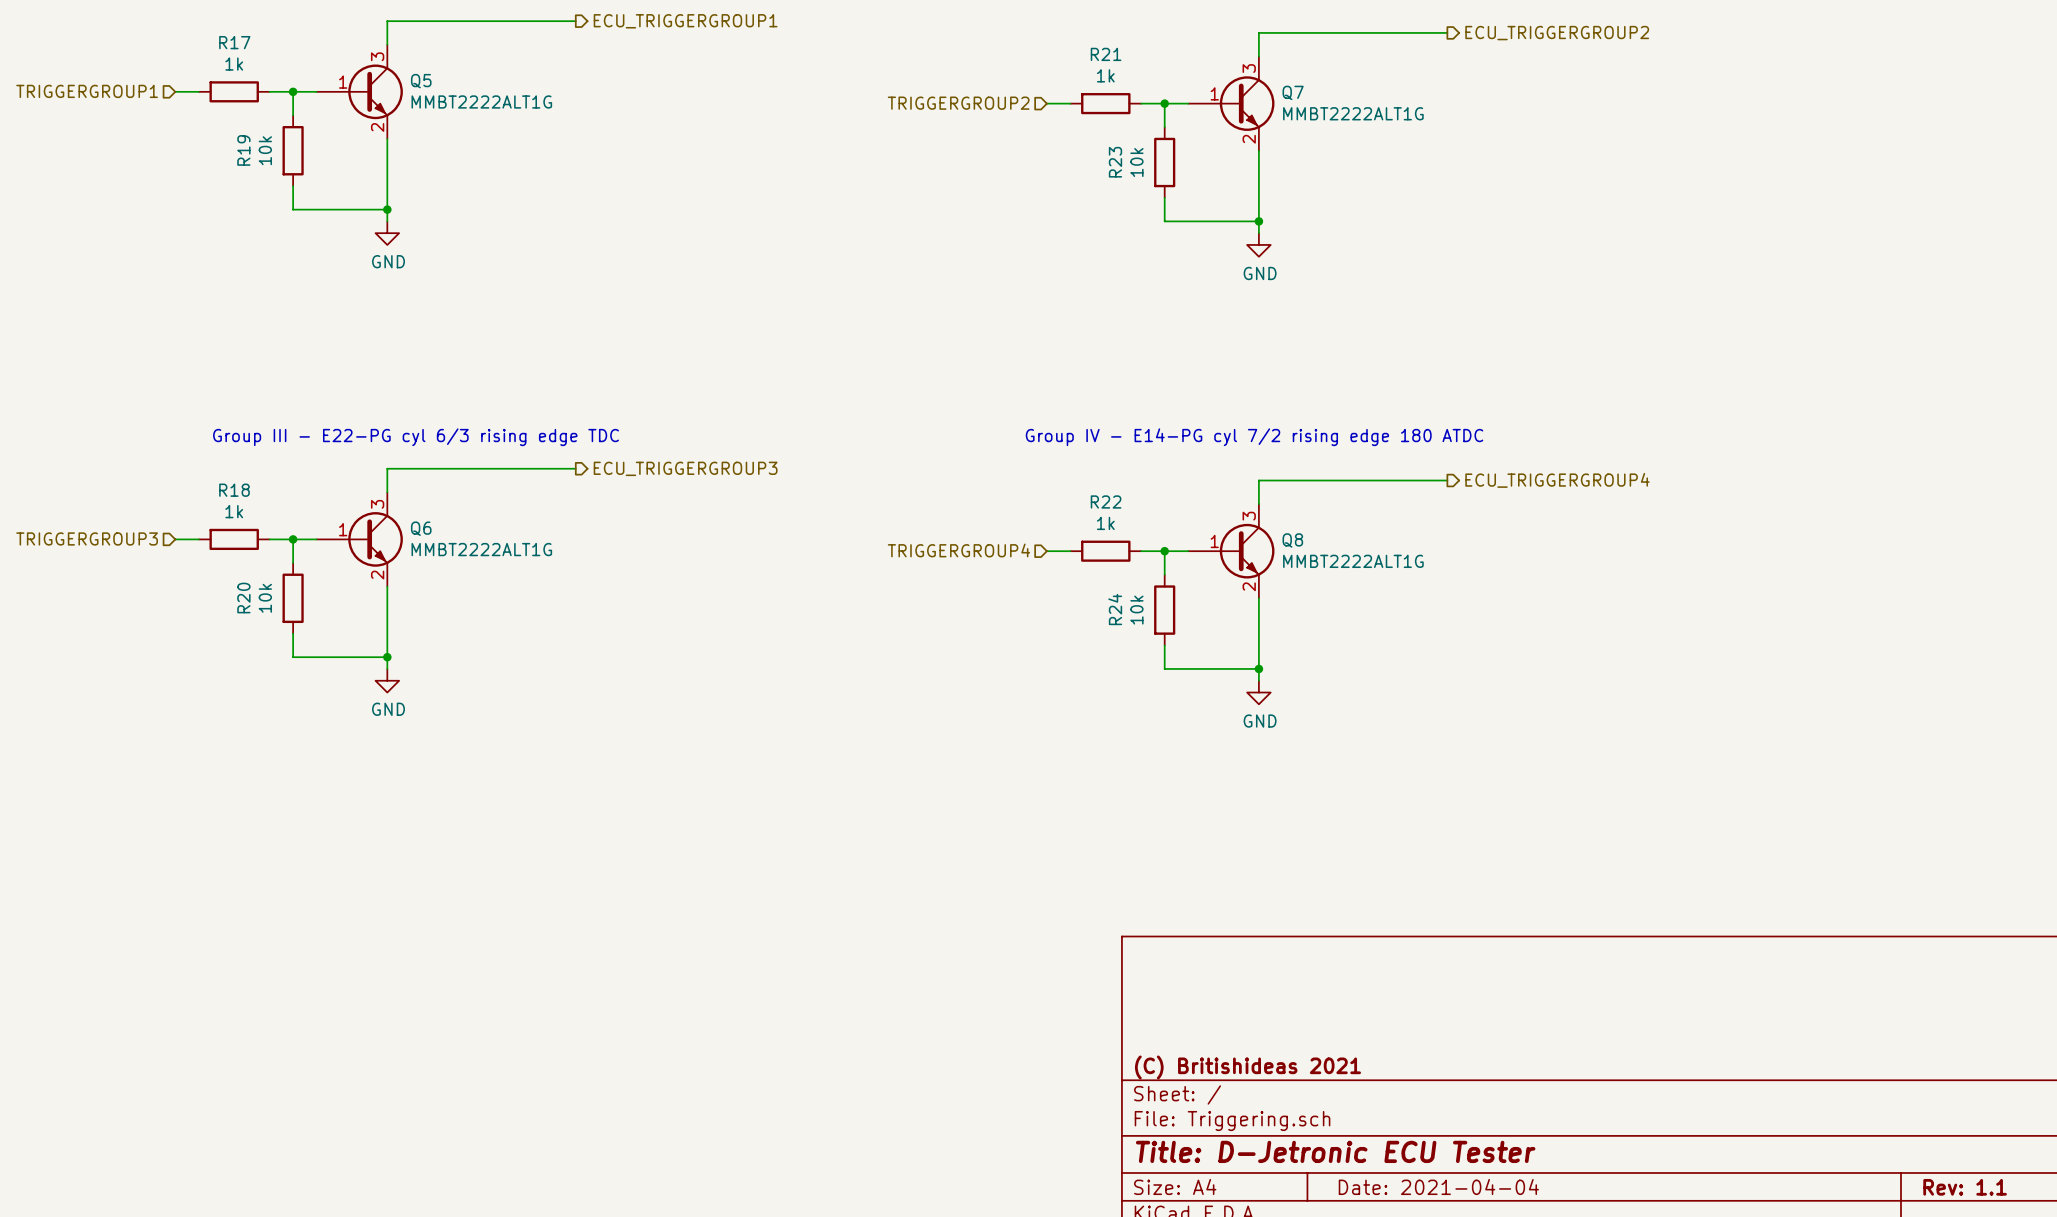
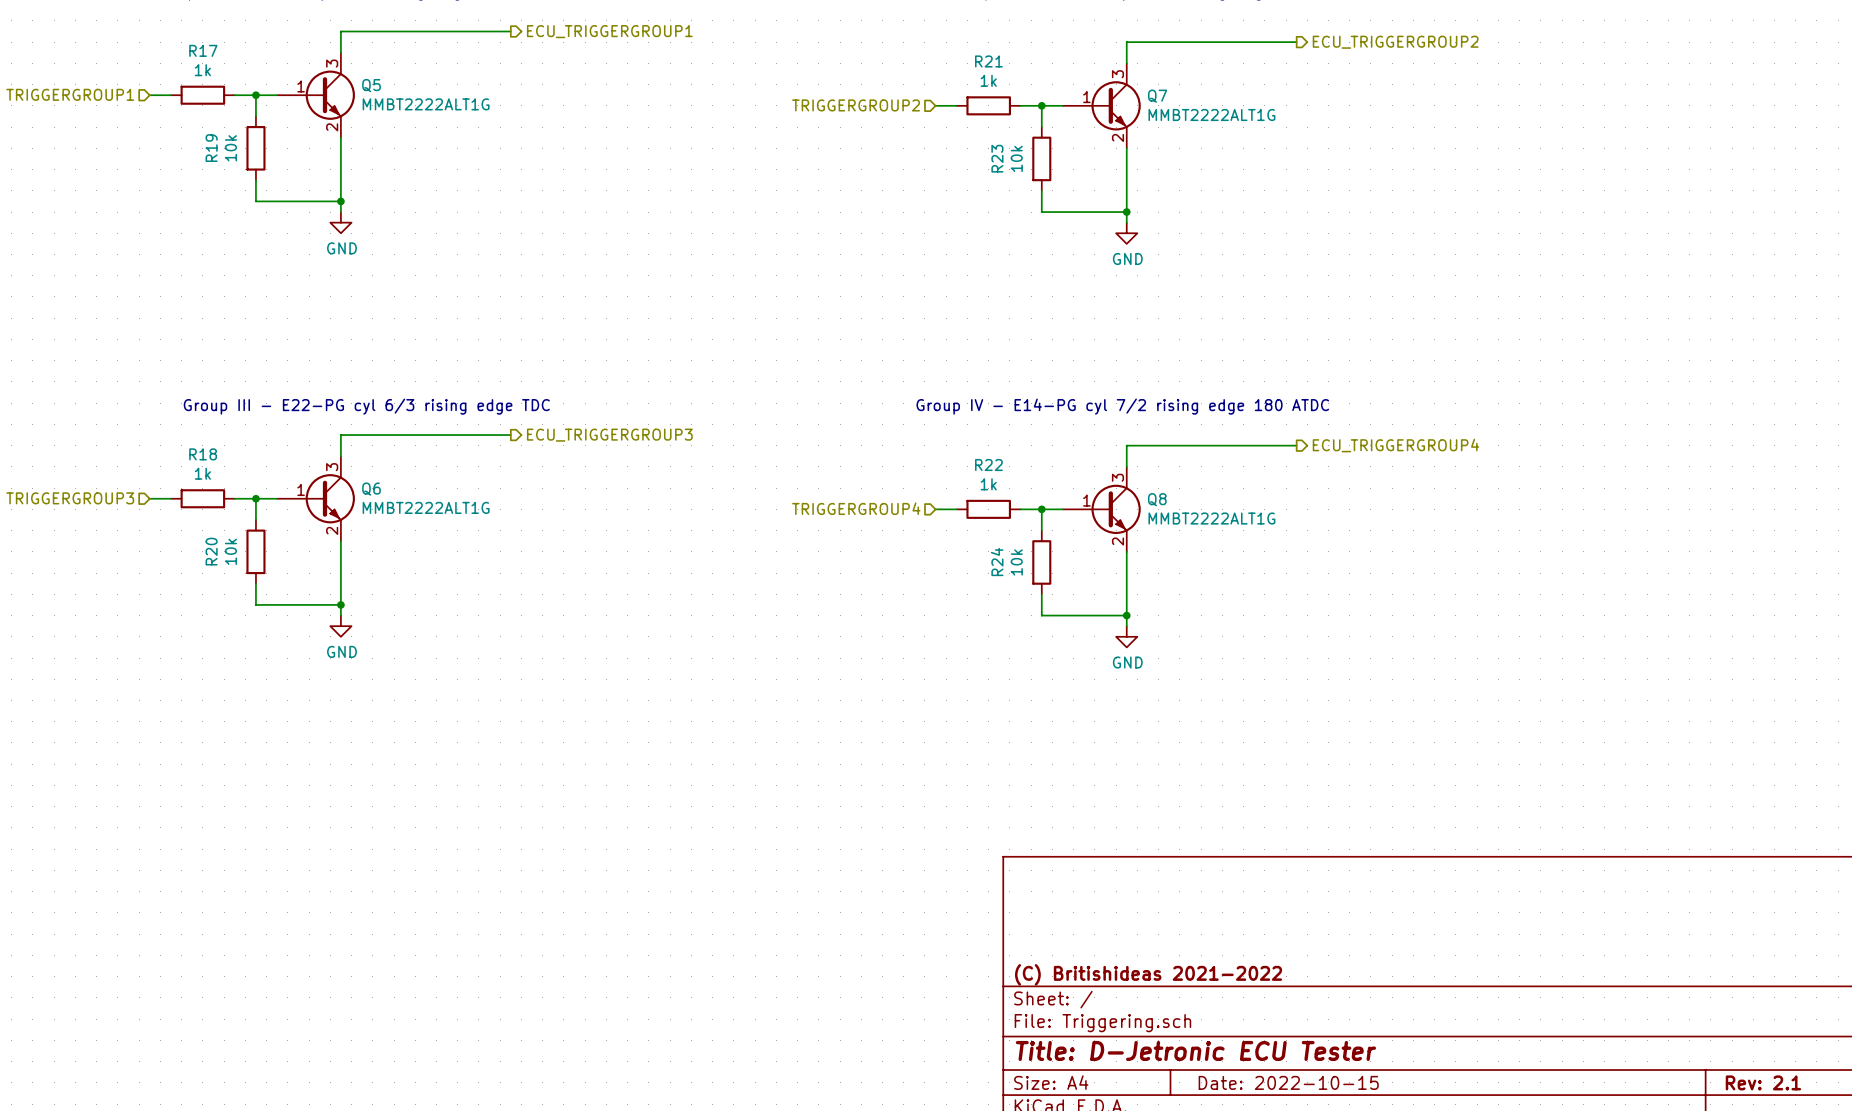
title block: (C) Britishideas 2021 (1248, 1067) -> (C) Britishideas 2021-2022 (1148, 974)
title block: Date: 2021-04-04 (1438, 1186) -> Date: 2022-10-15 (1288, 1082)
title block: Rev: 1.1 (1965, 1187) -> Rev: 2.1 (1763, 1082)

